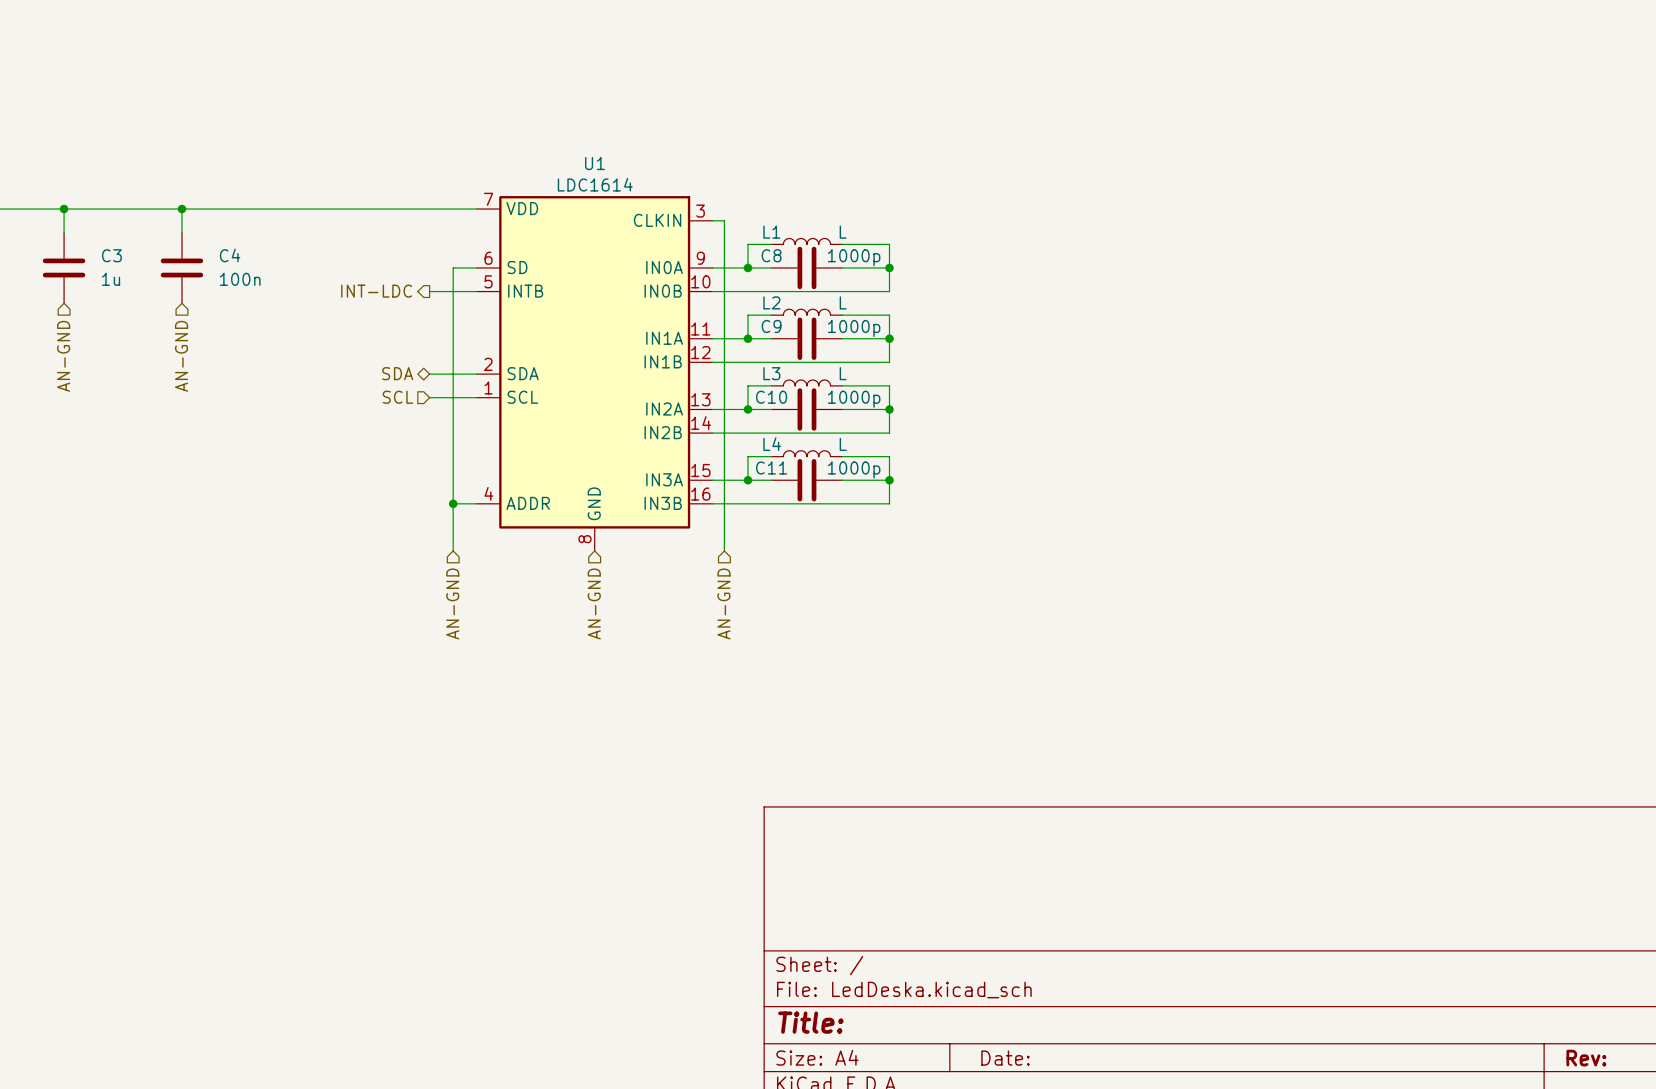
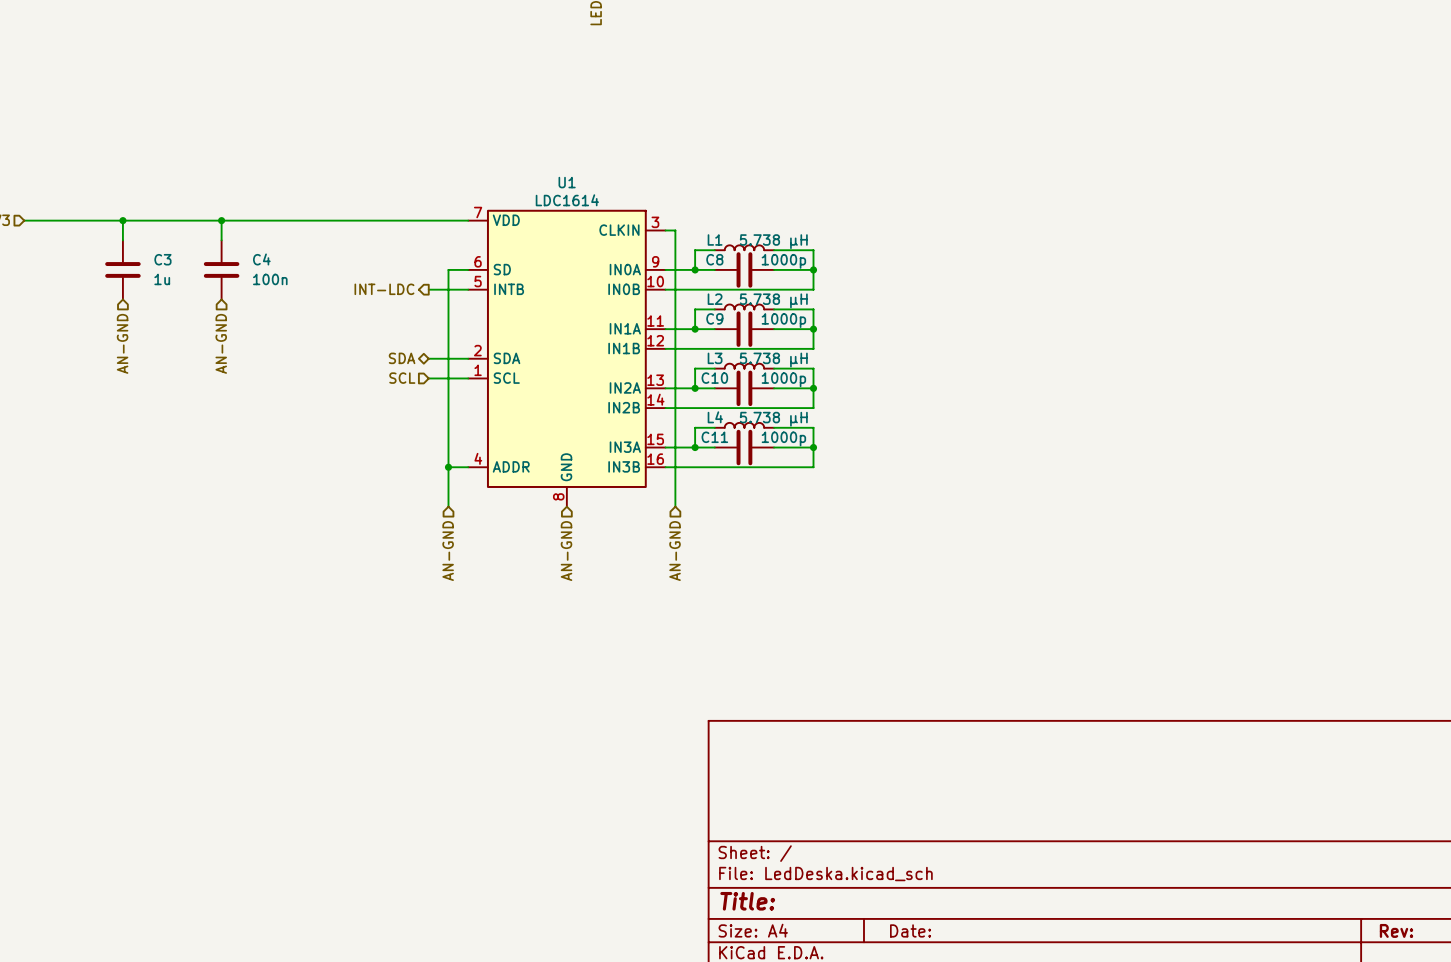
L1 value: L (843, 232) -> 5.738 µH (773, 241)
L2 value: L (843, 302) -> 5.738 µH (773, 300)
L3 value: L (843, 373) -> 5.738 µH (773, 360)
L4 value: L (843, 444) -> 5.738 µH (773, 419)

